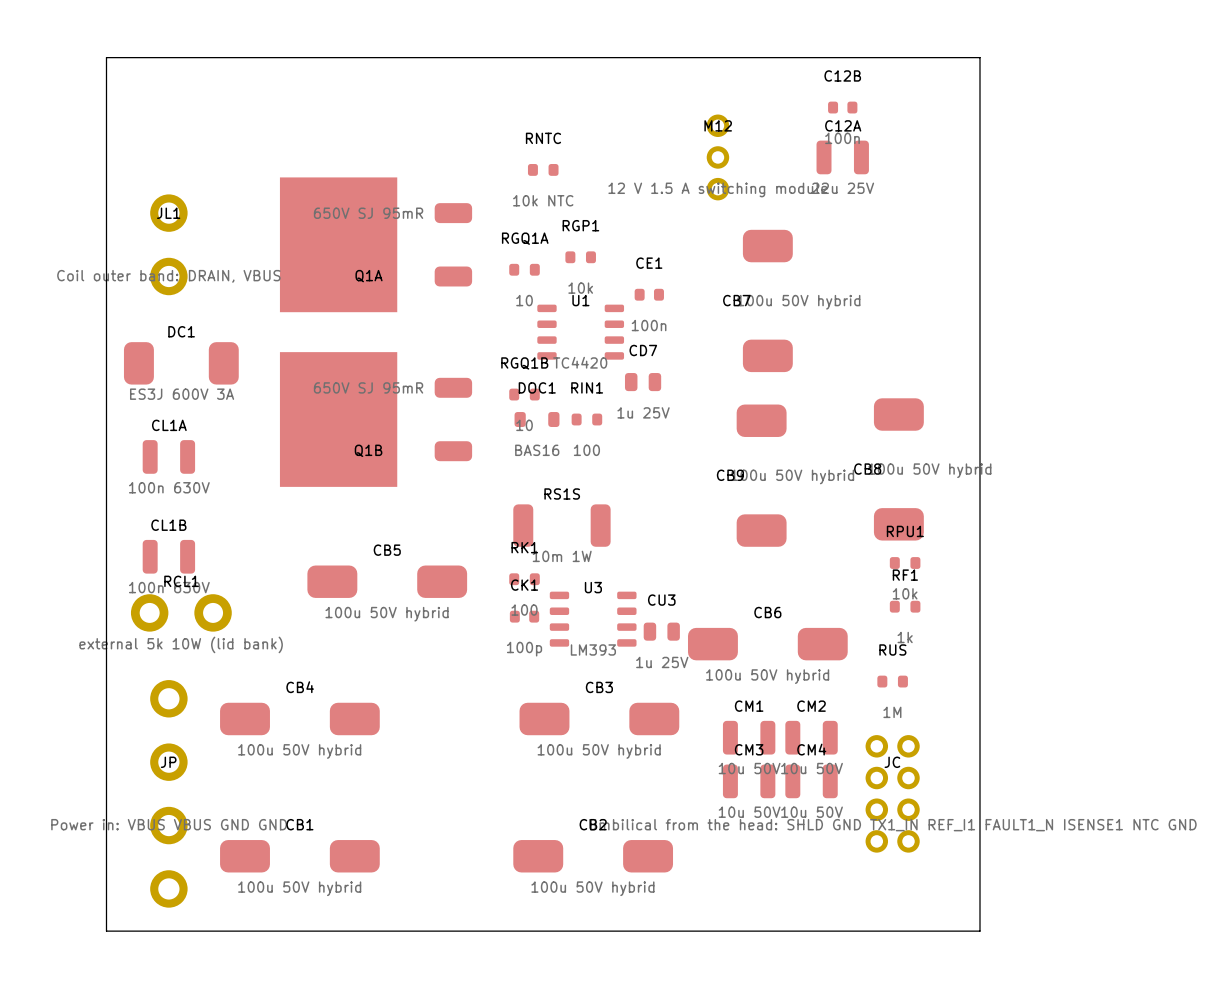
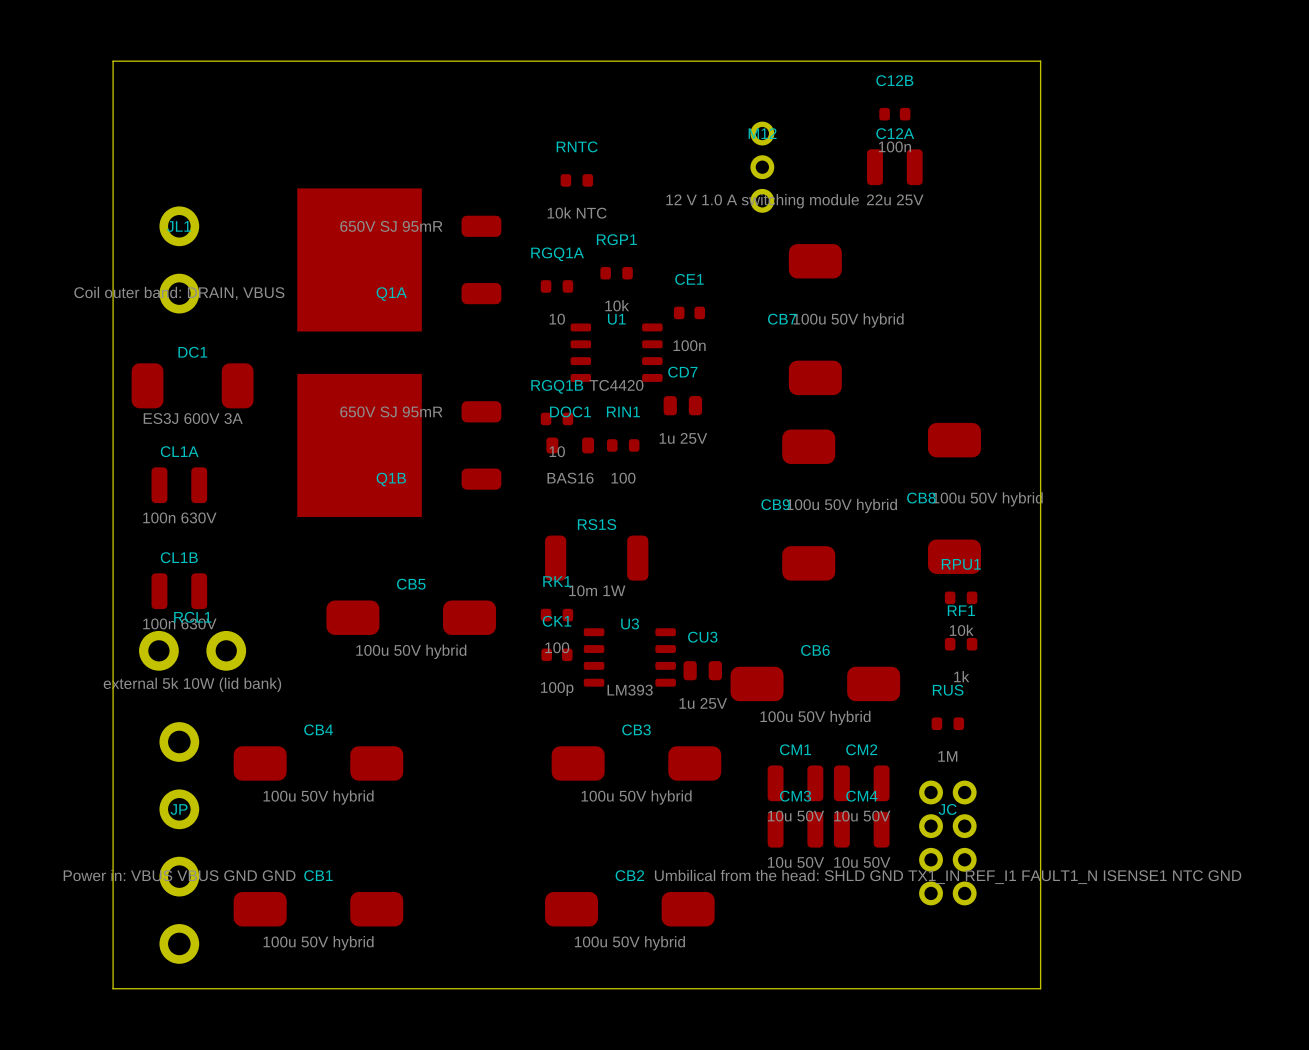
M12 value: 12 V 1.5 A switching module (717, 189) -> 12 V 1.0 A switching module (762, 201)

